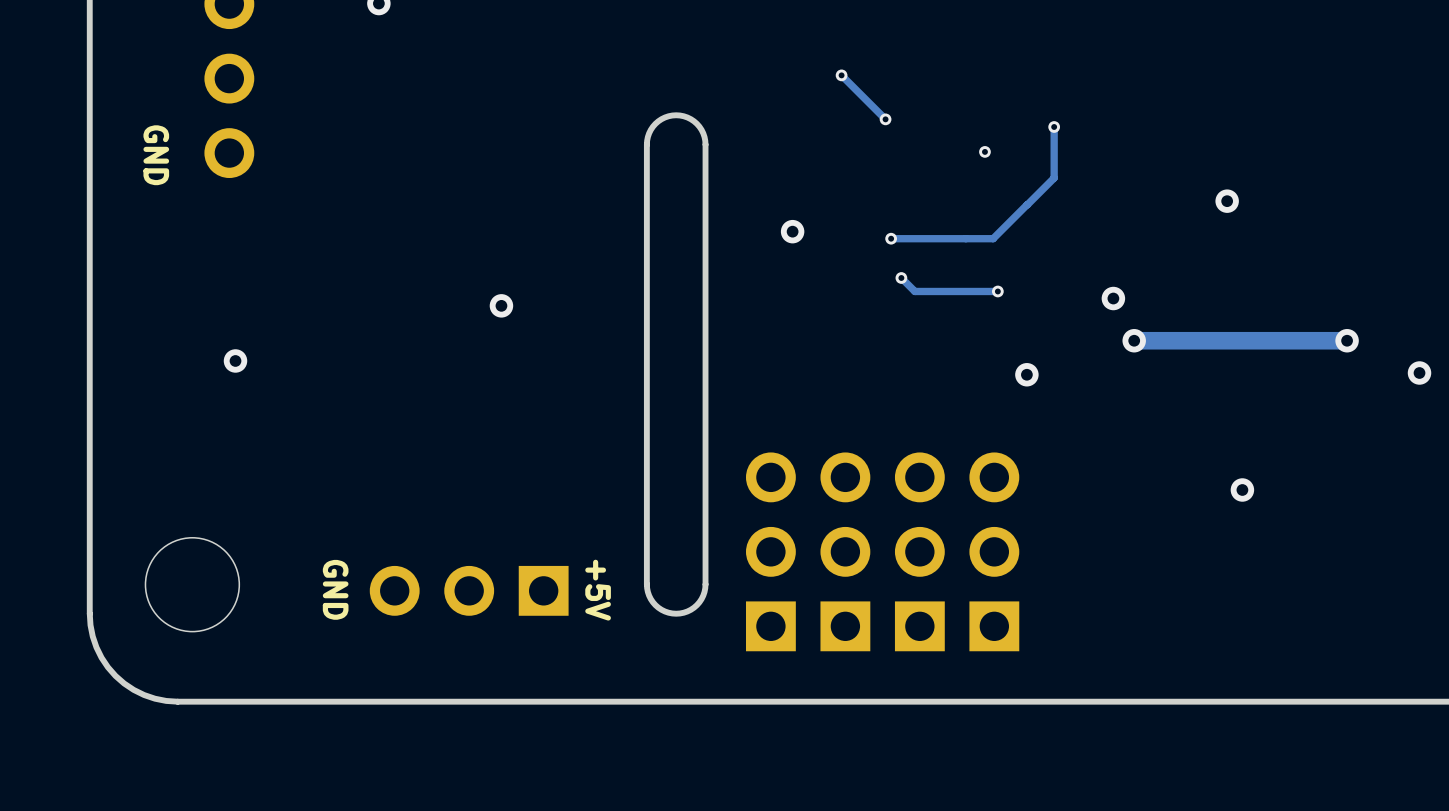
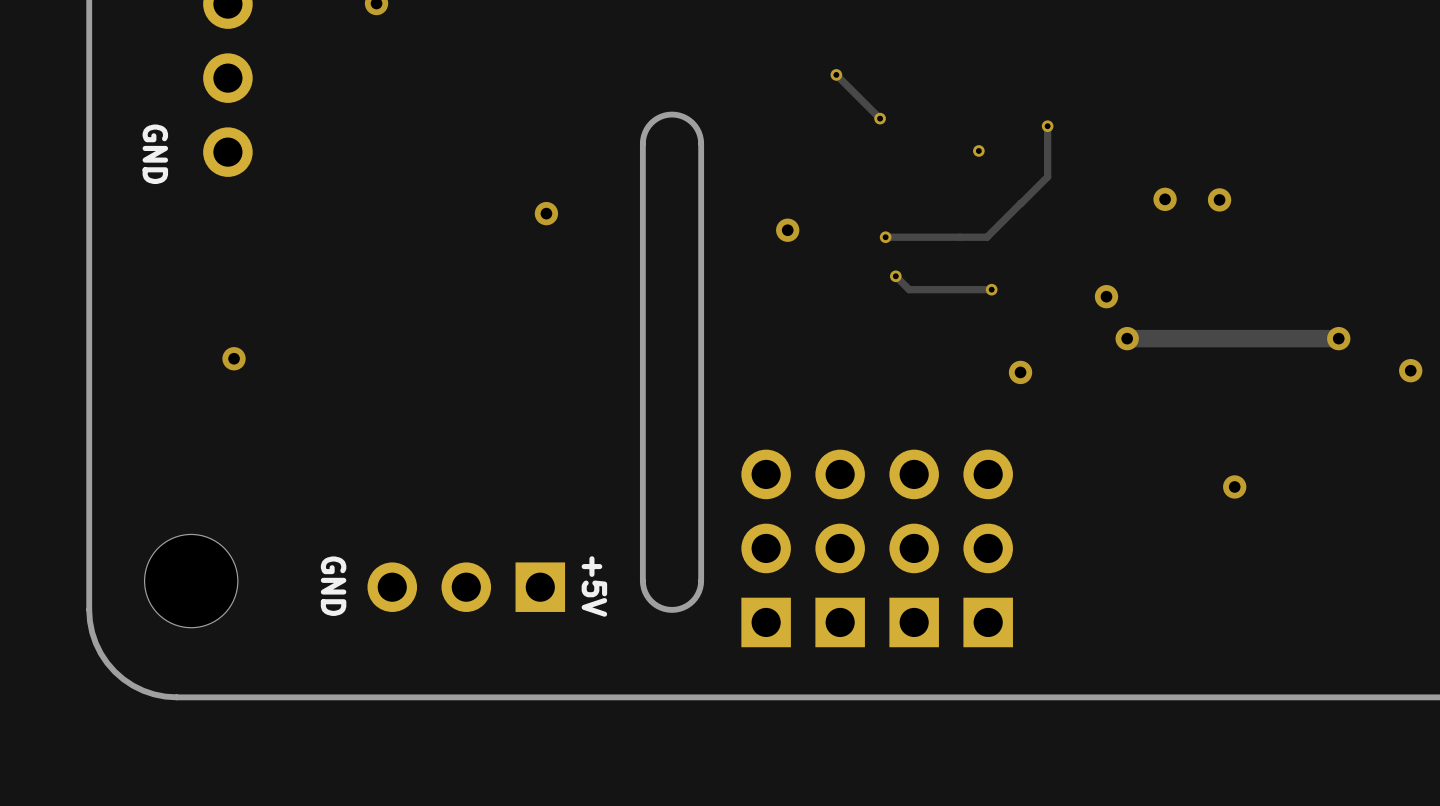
via: none -> (1165, 199)
via position: (501, 305) -> (546, 213)

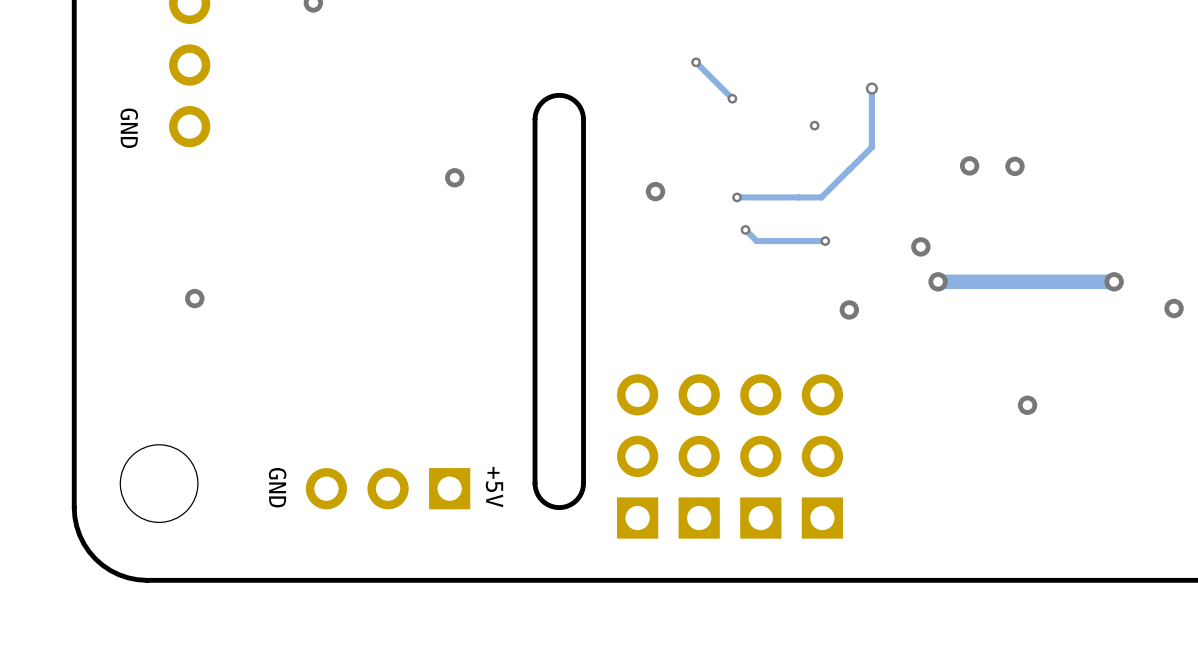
track: none -> (871, 88) (871, 105)
via: none -> (871, 88)
via: (1047, 126) -> none

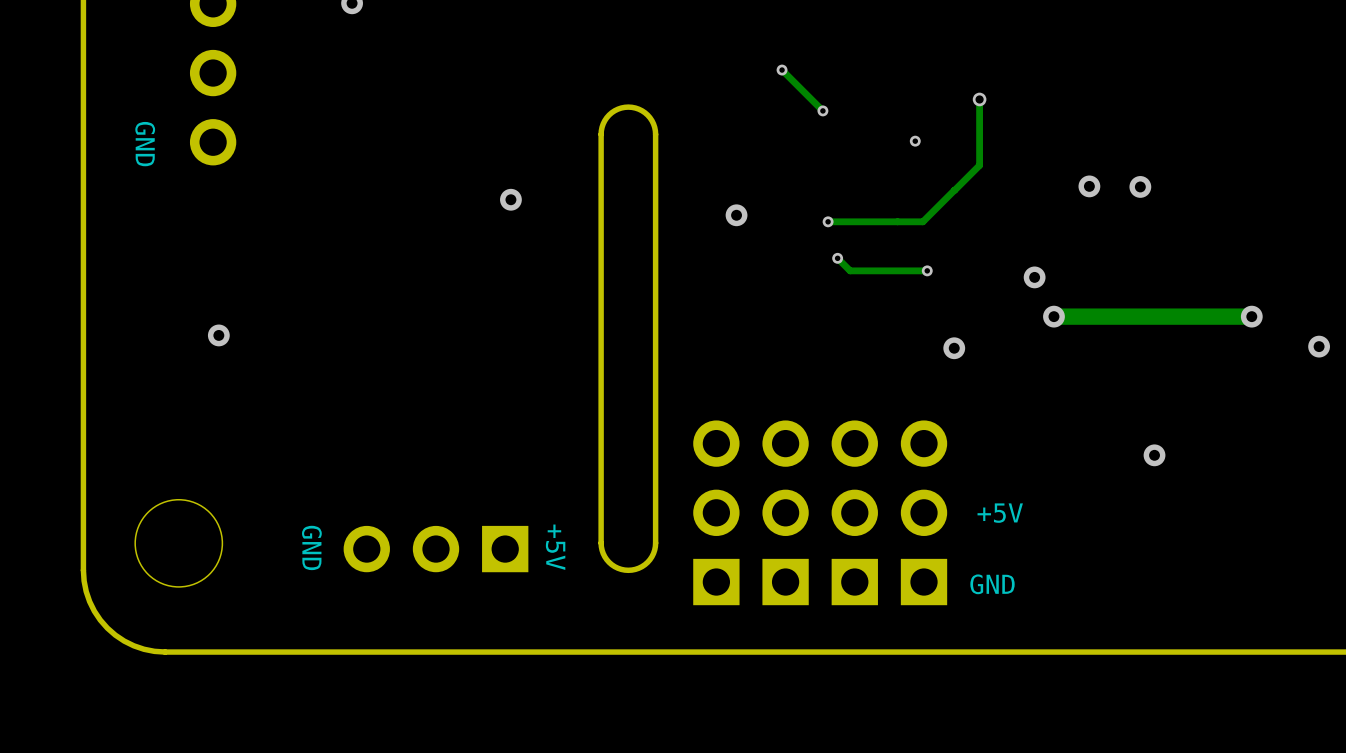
text: none -> +5V (1000, 513)
text: none -> GND (992, 584)

